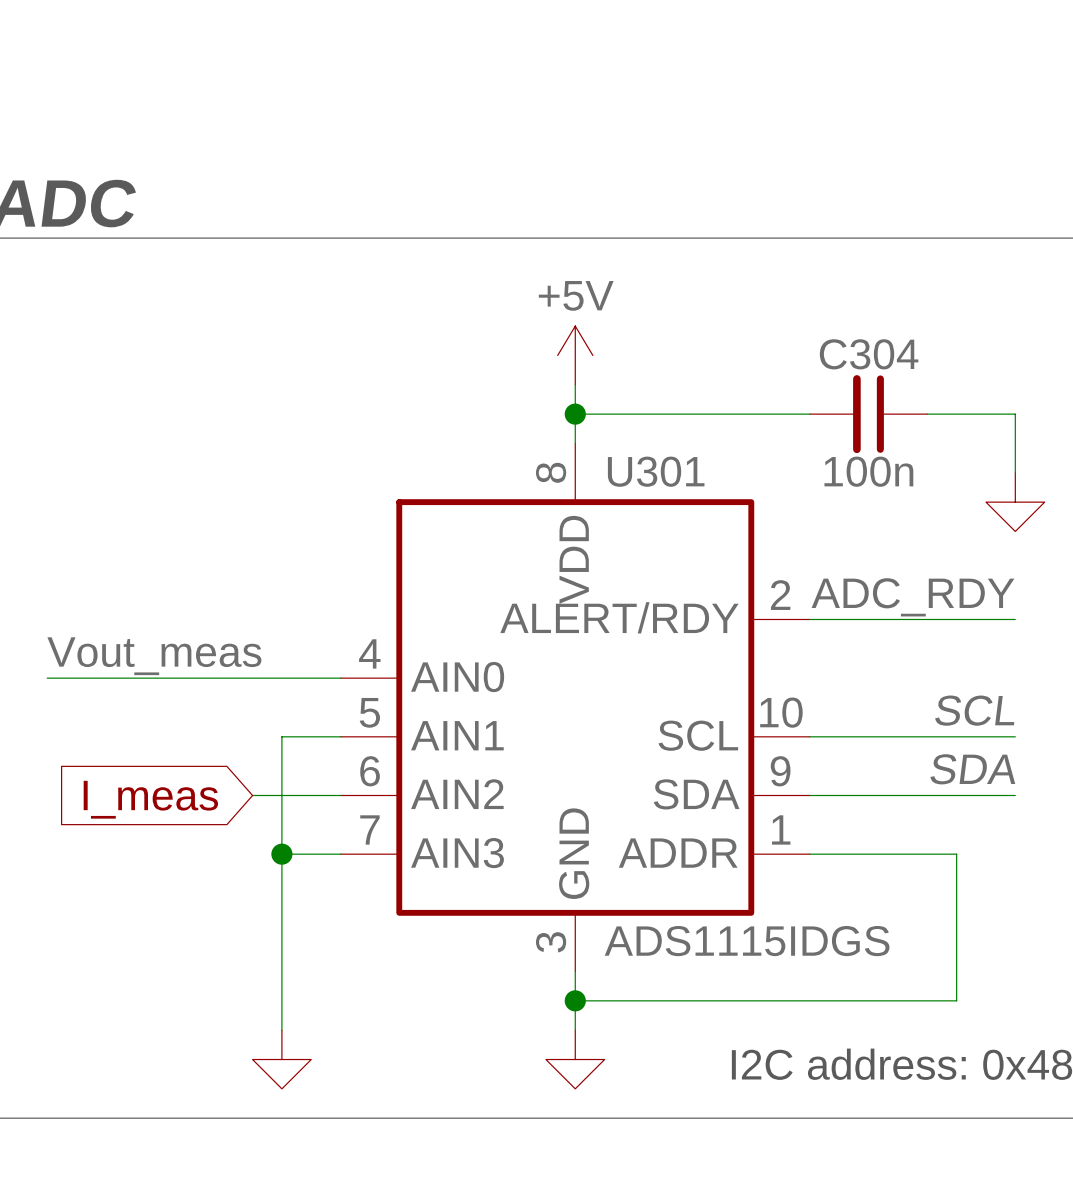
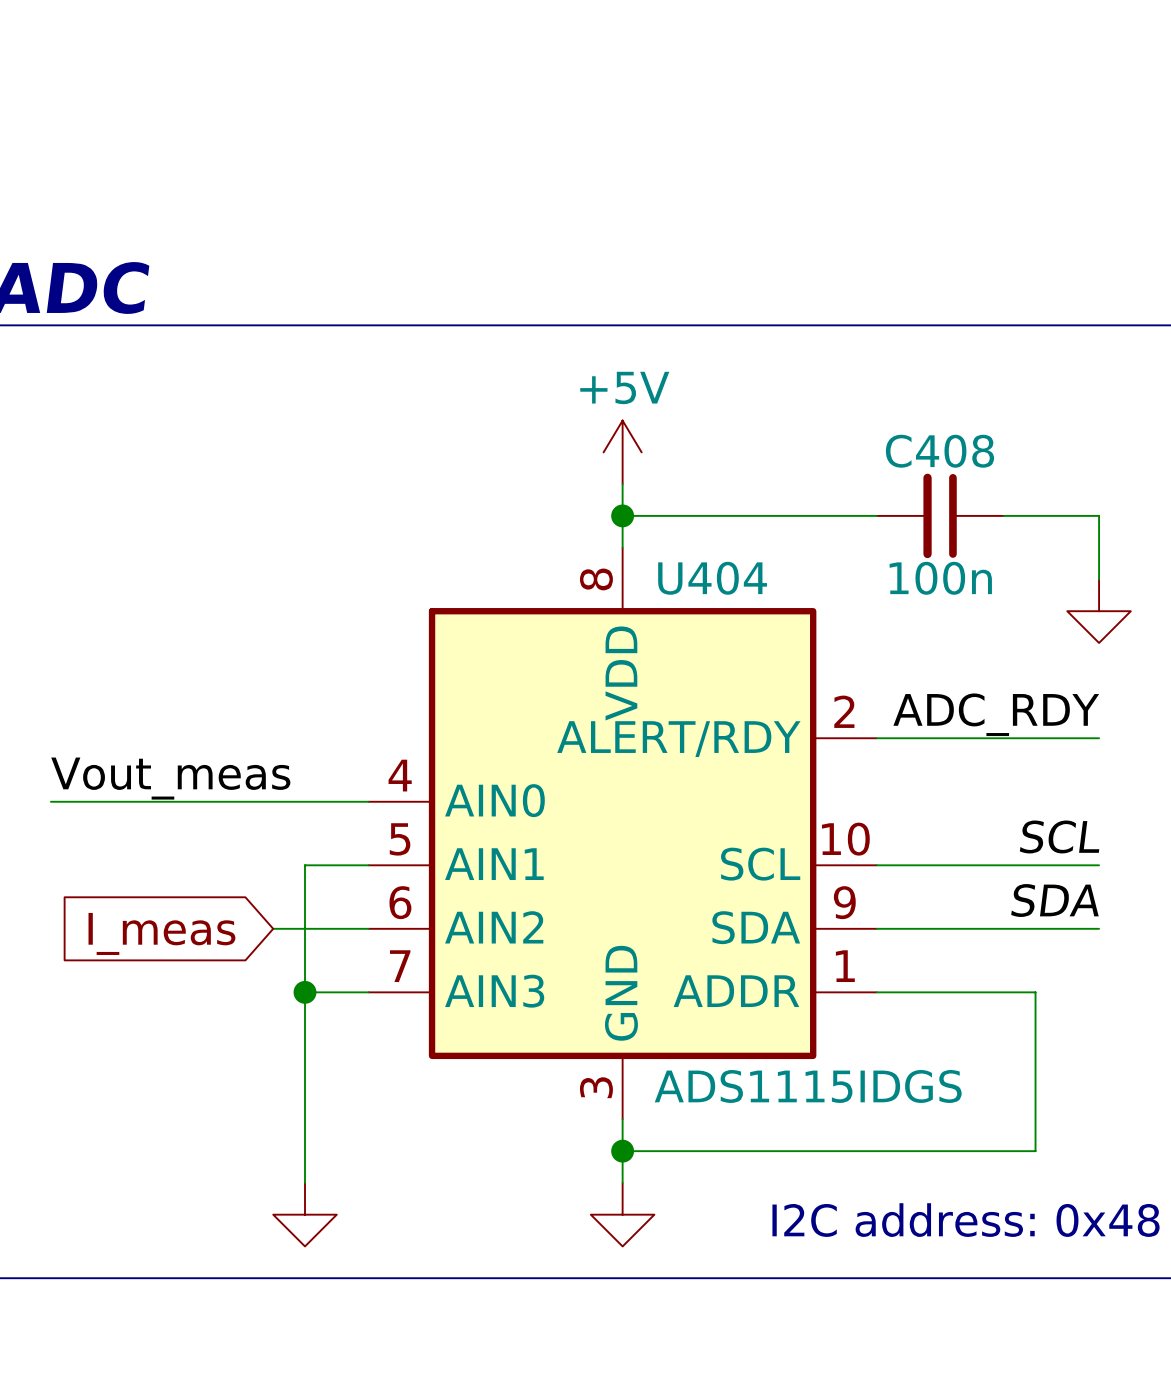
C304 name: C304 (869, 354) -> C408 (939, 451)
U301 name: U301 (656, 471) -> U404 (712, 578)

